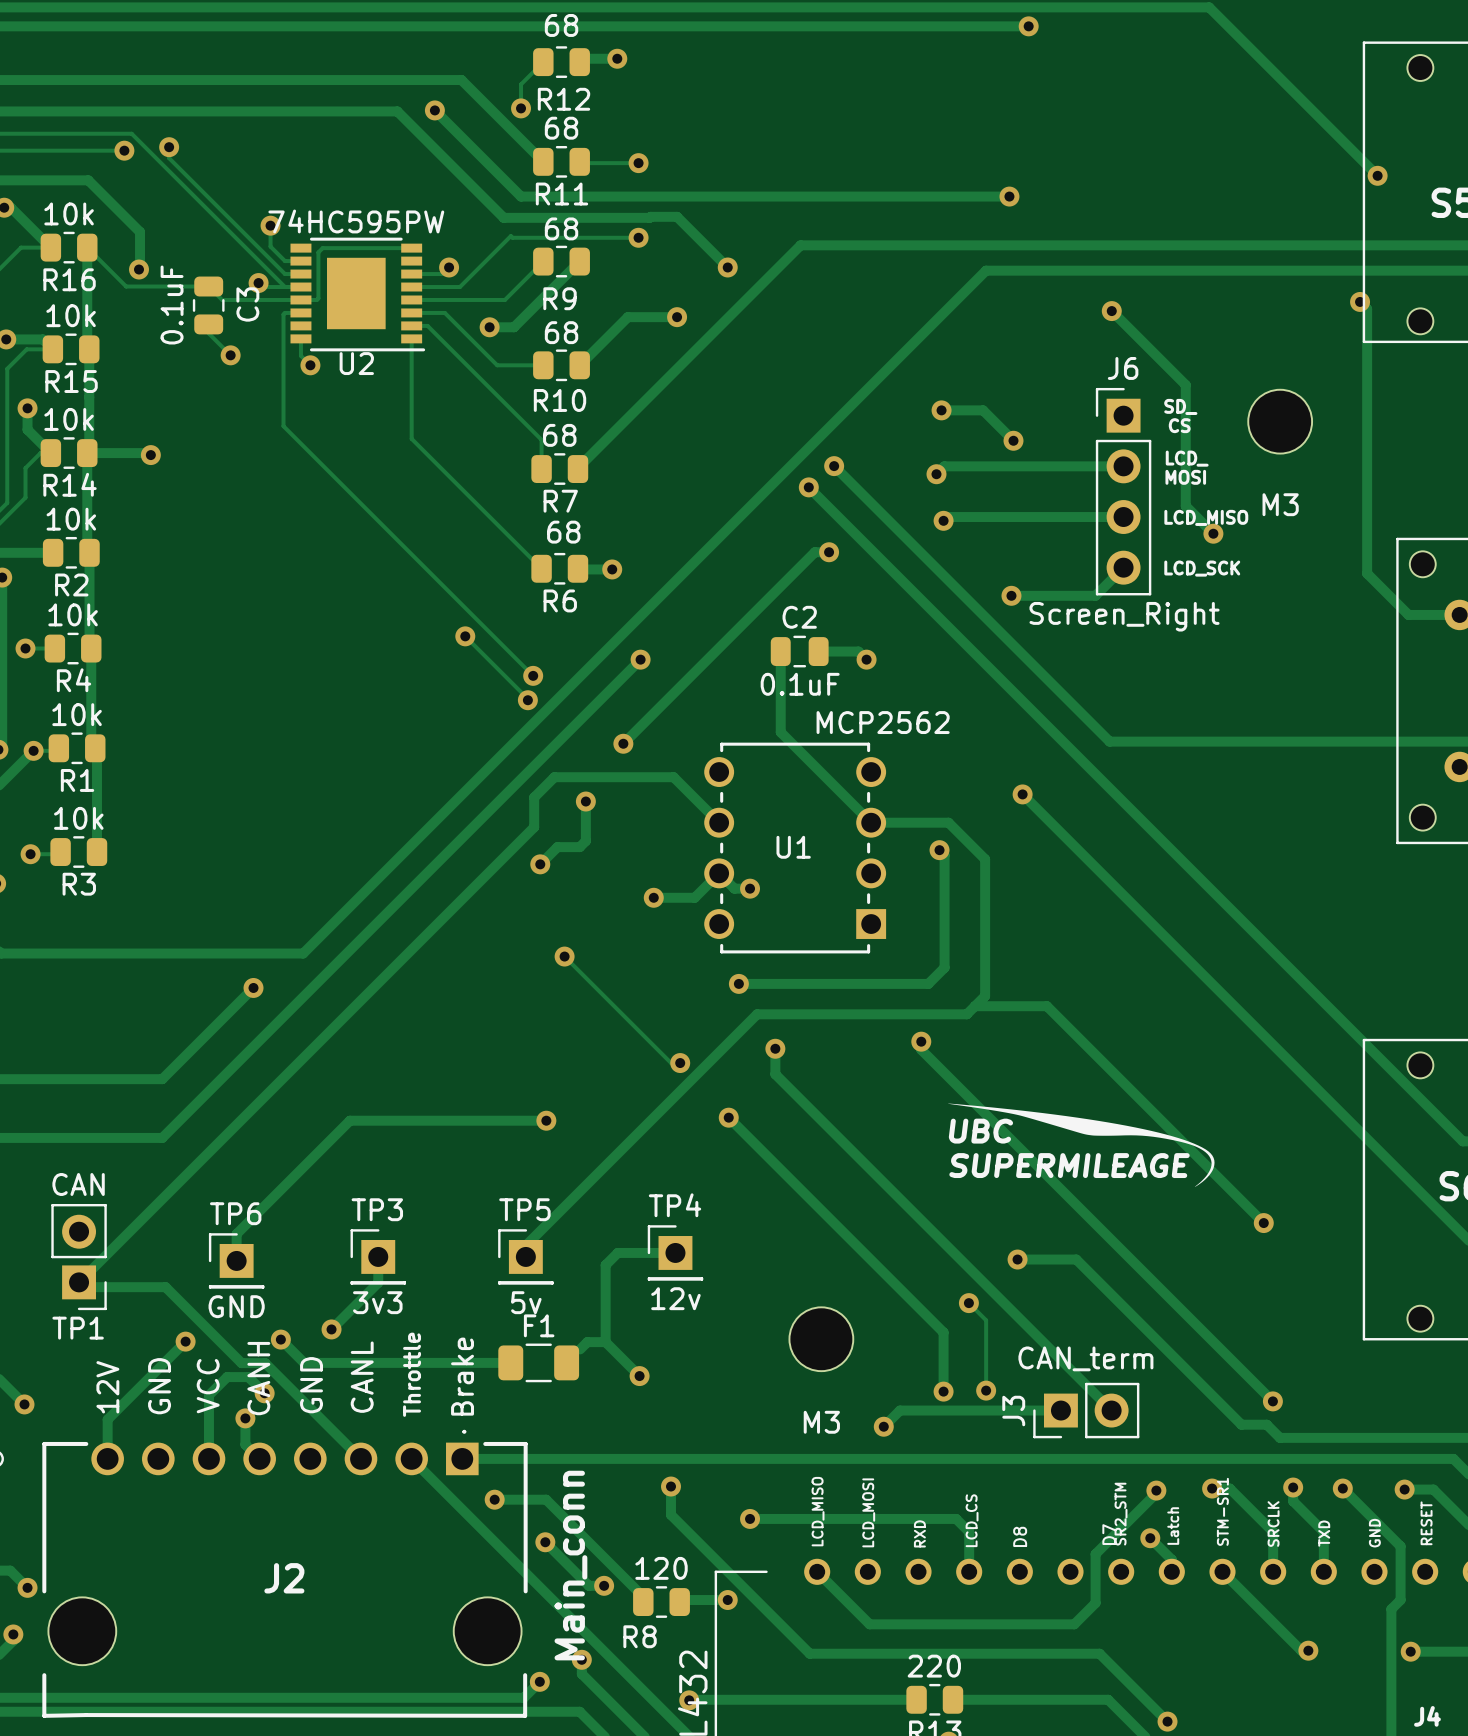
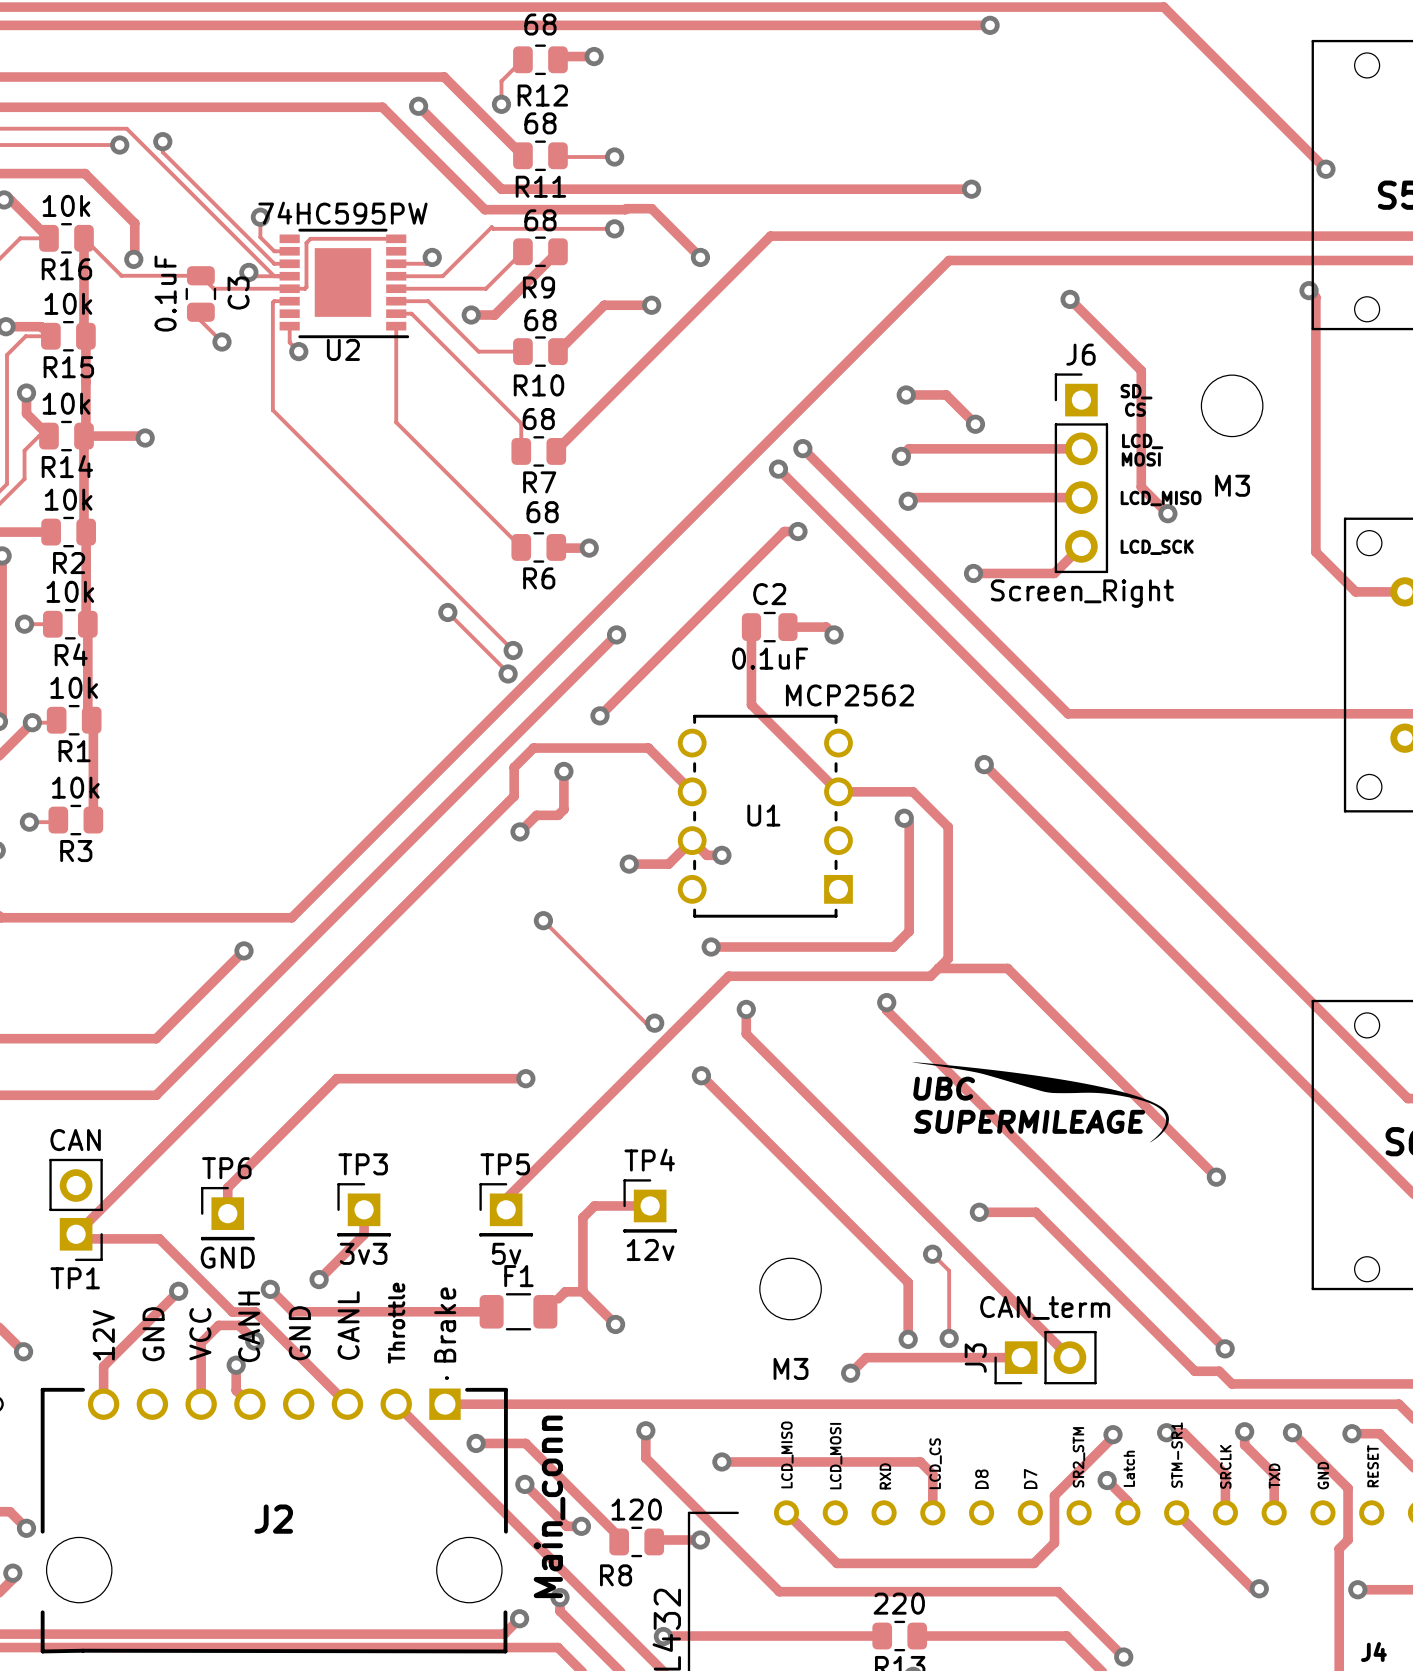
text position: D7 (1109, 1534) -> D7 (1030, 1478)

